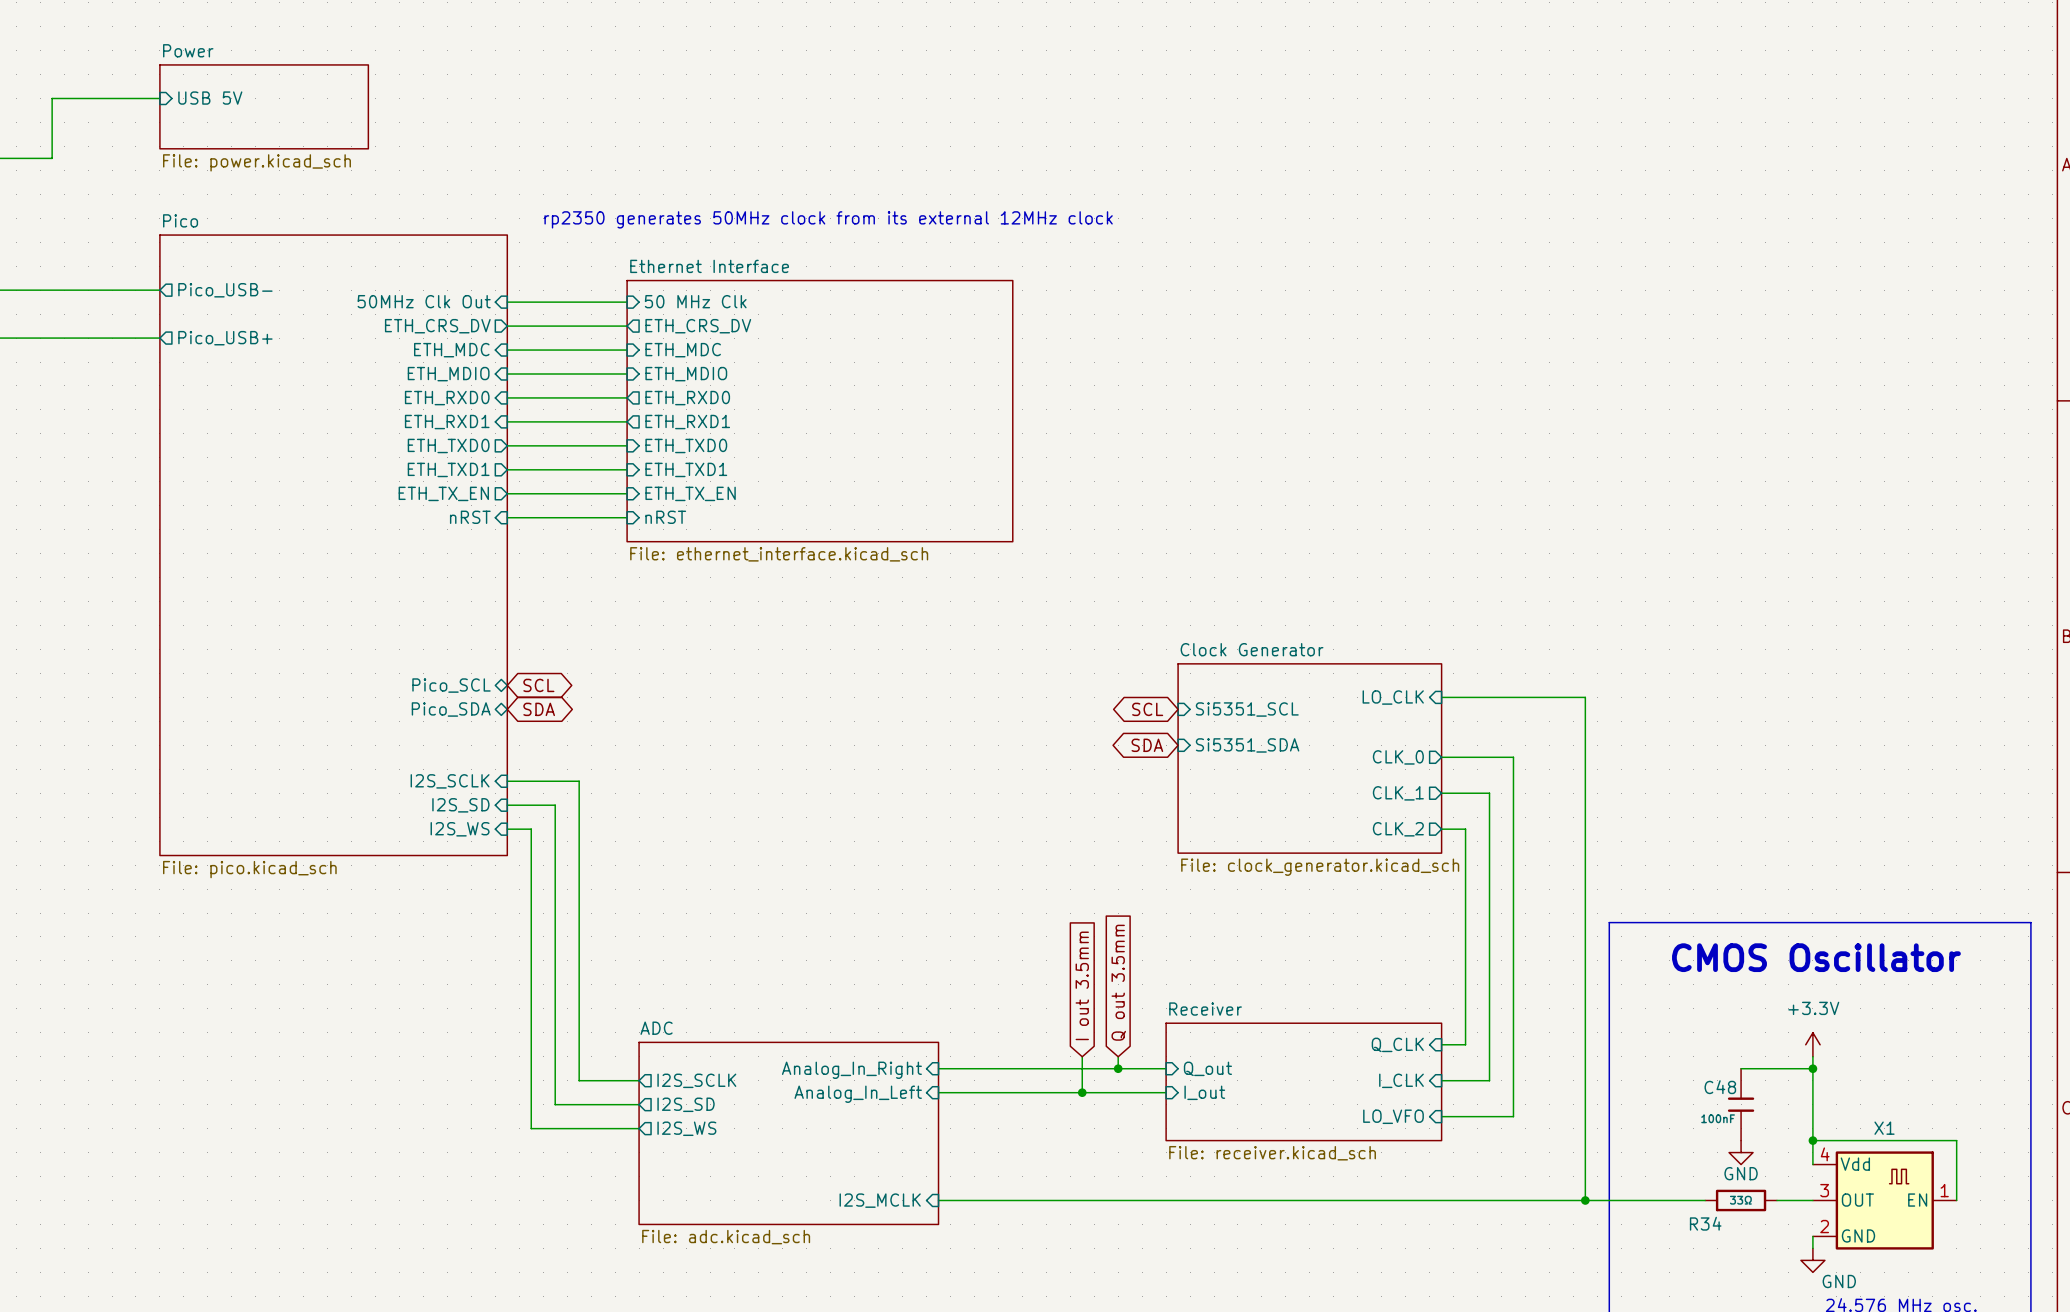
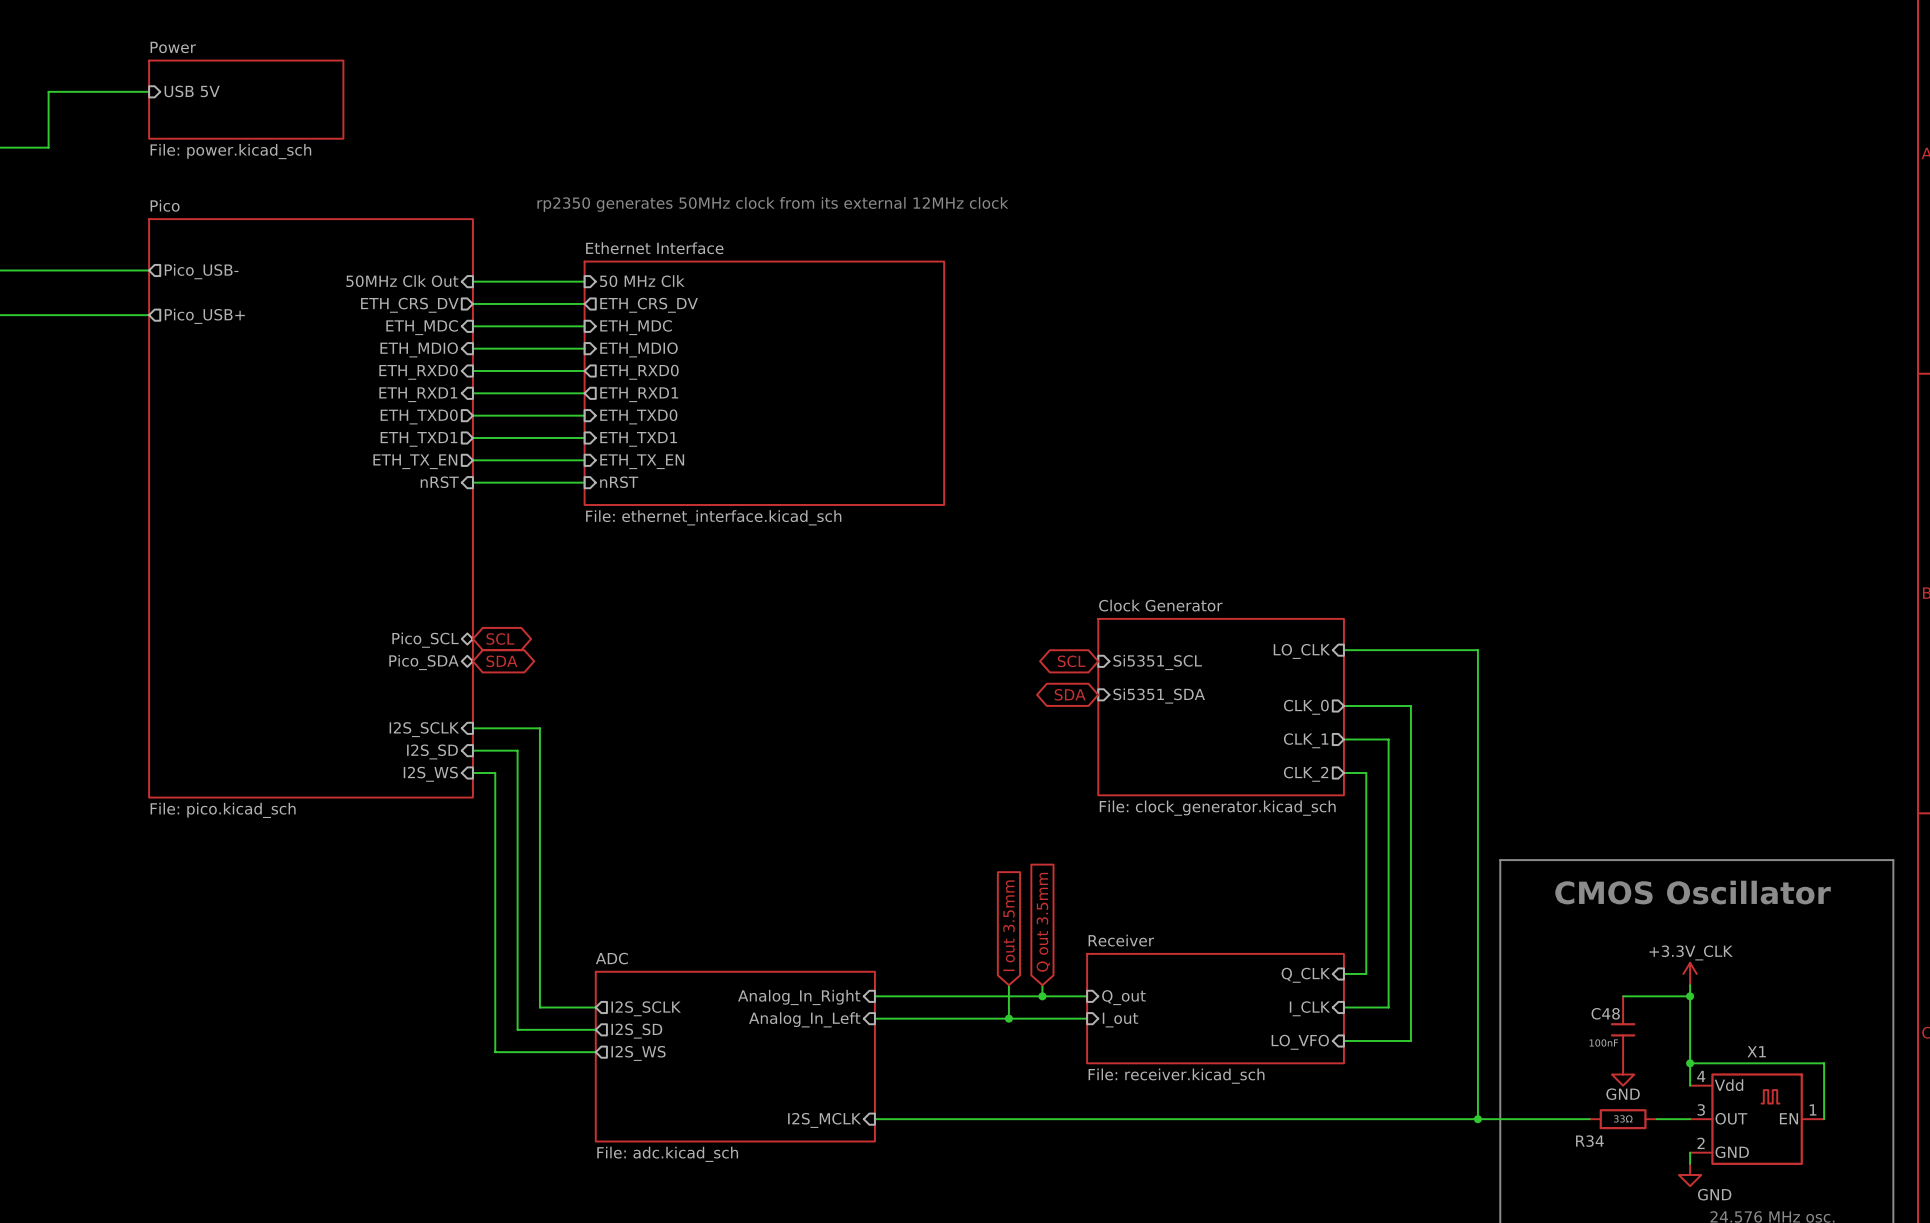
power symbol: +3.3V (1812, 1044) -> +3.3V_CLK (1690, 973)

